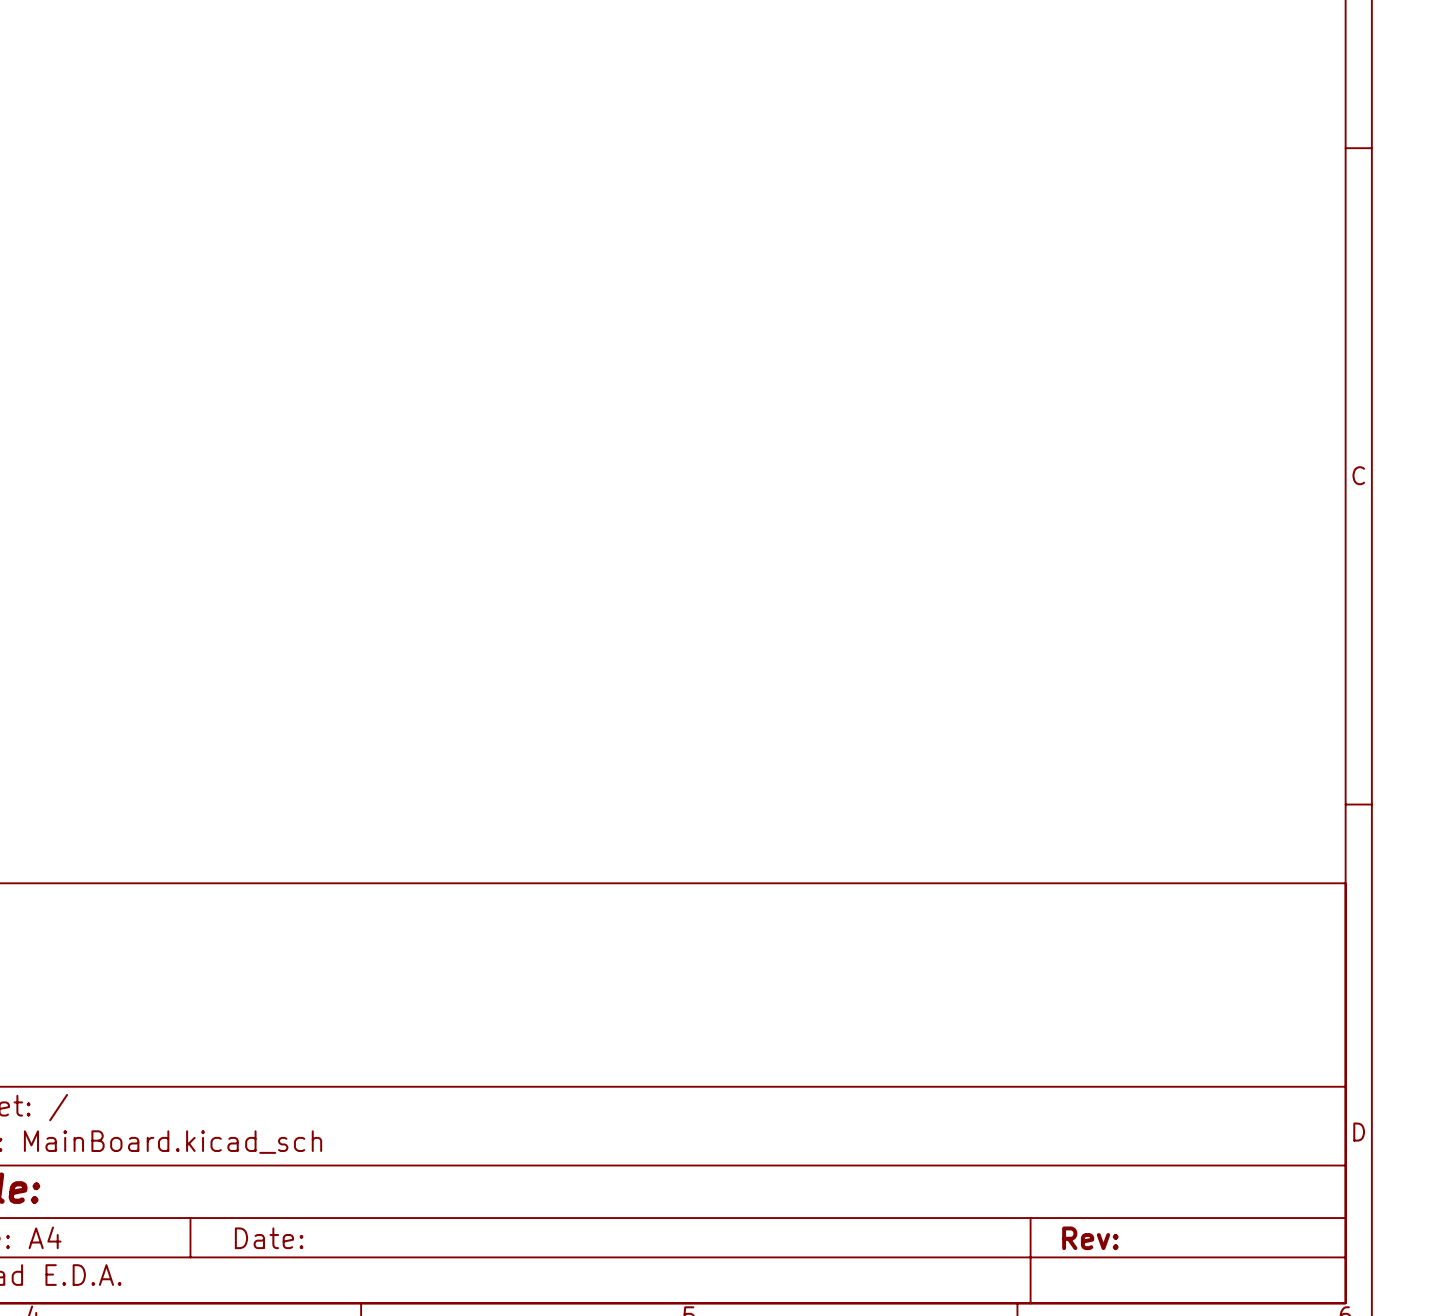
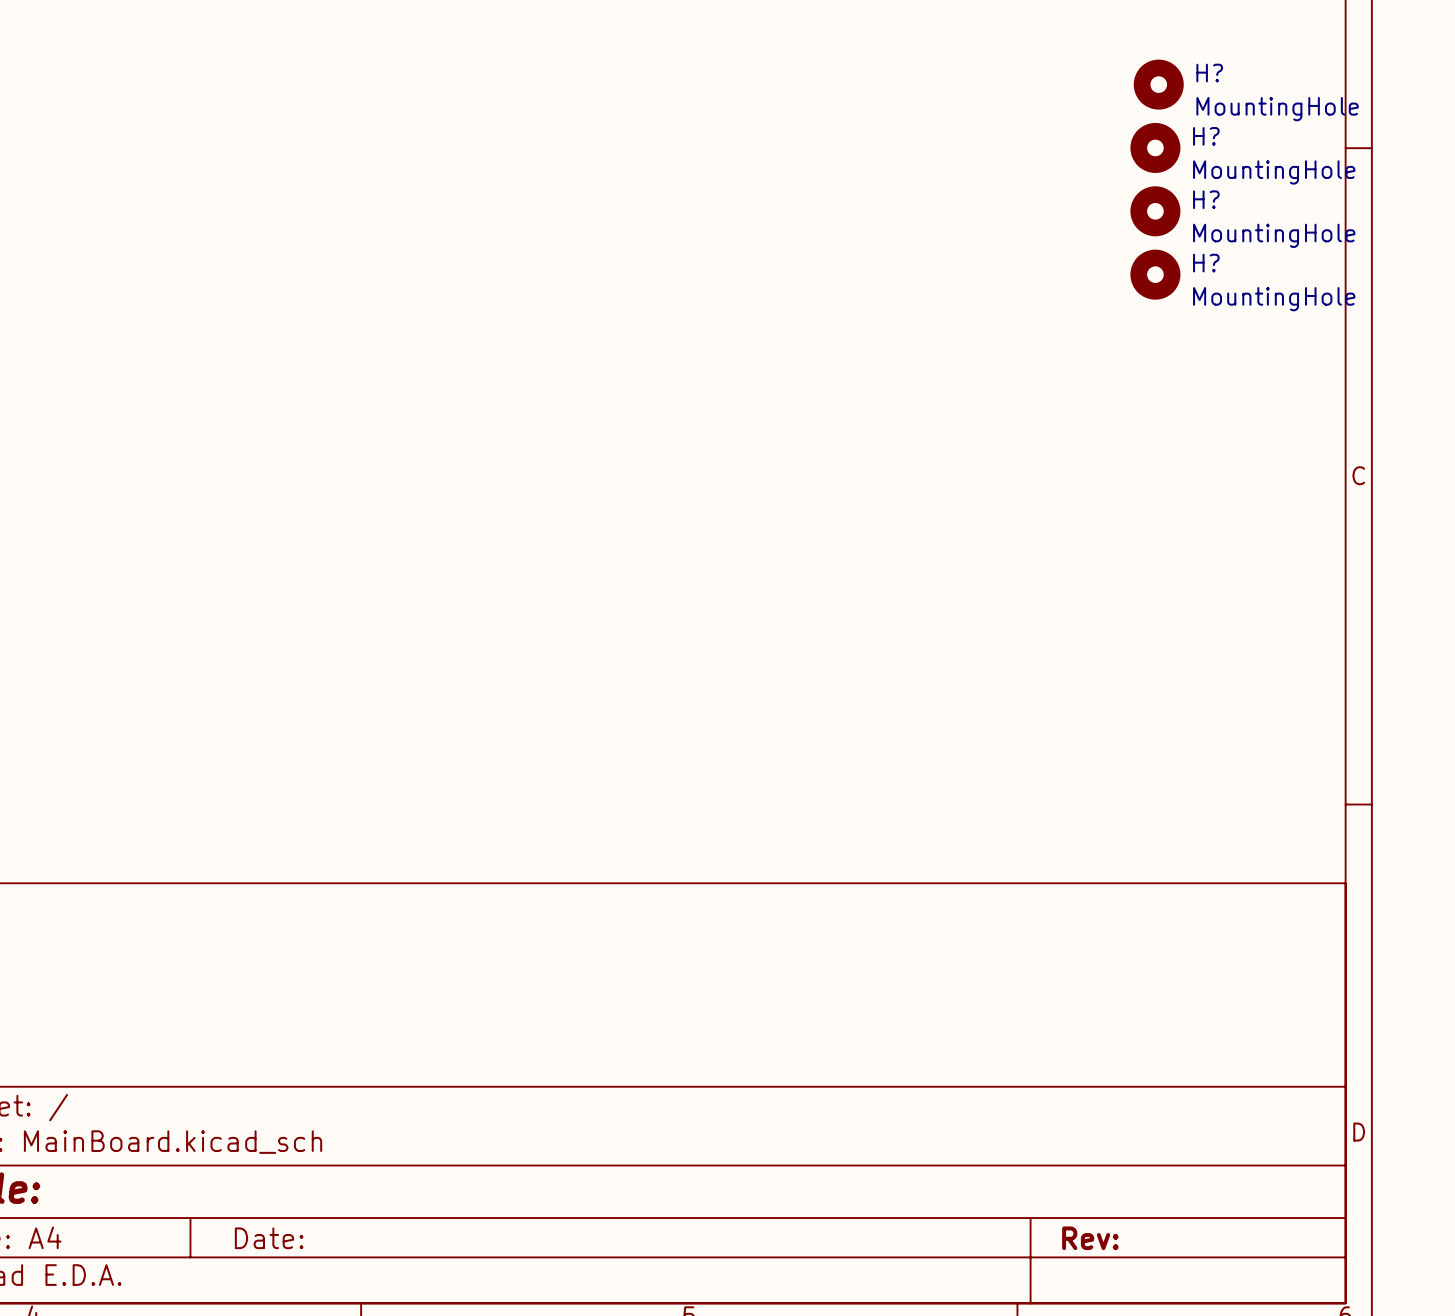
H?: none -> MountingHole (1158, 84)
H?: none -> MountingHole (1155, 147)
H?: none -> MountingHole (1155, 211)
H?: none -> MountingHole (1155, 274)

